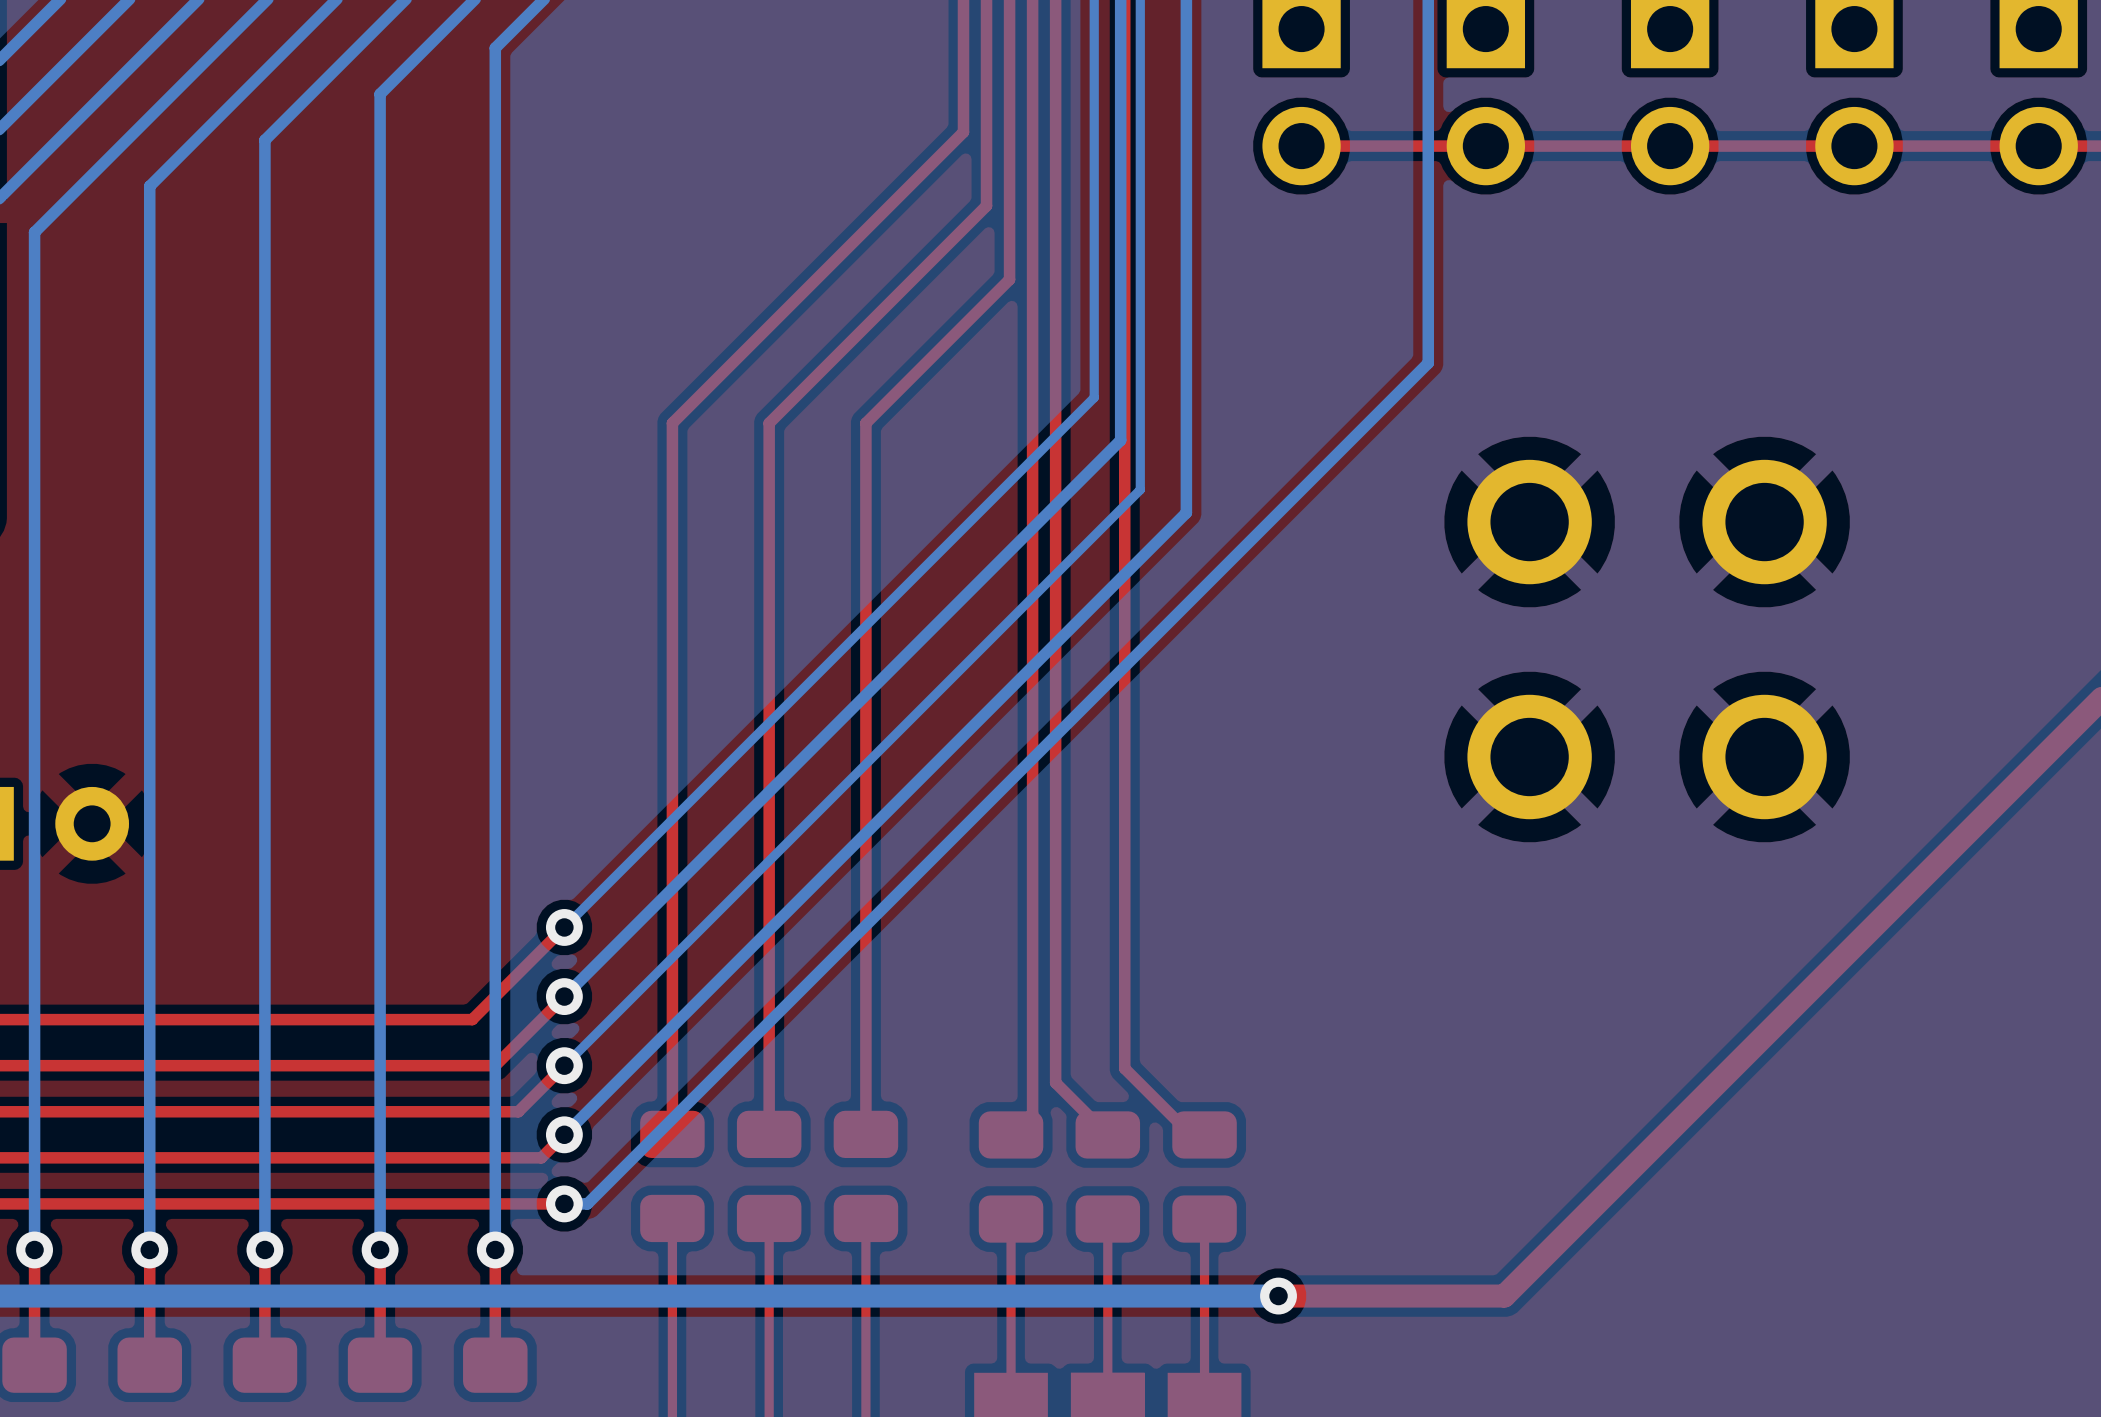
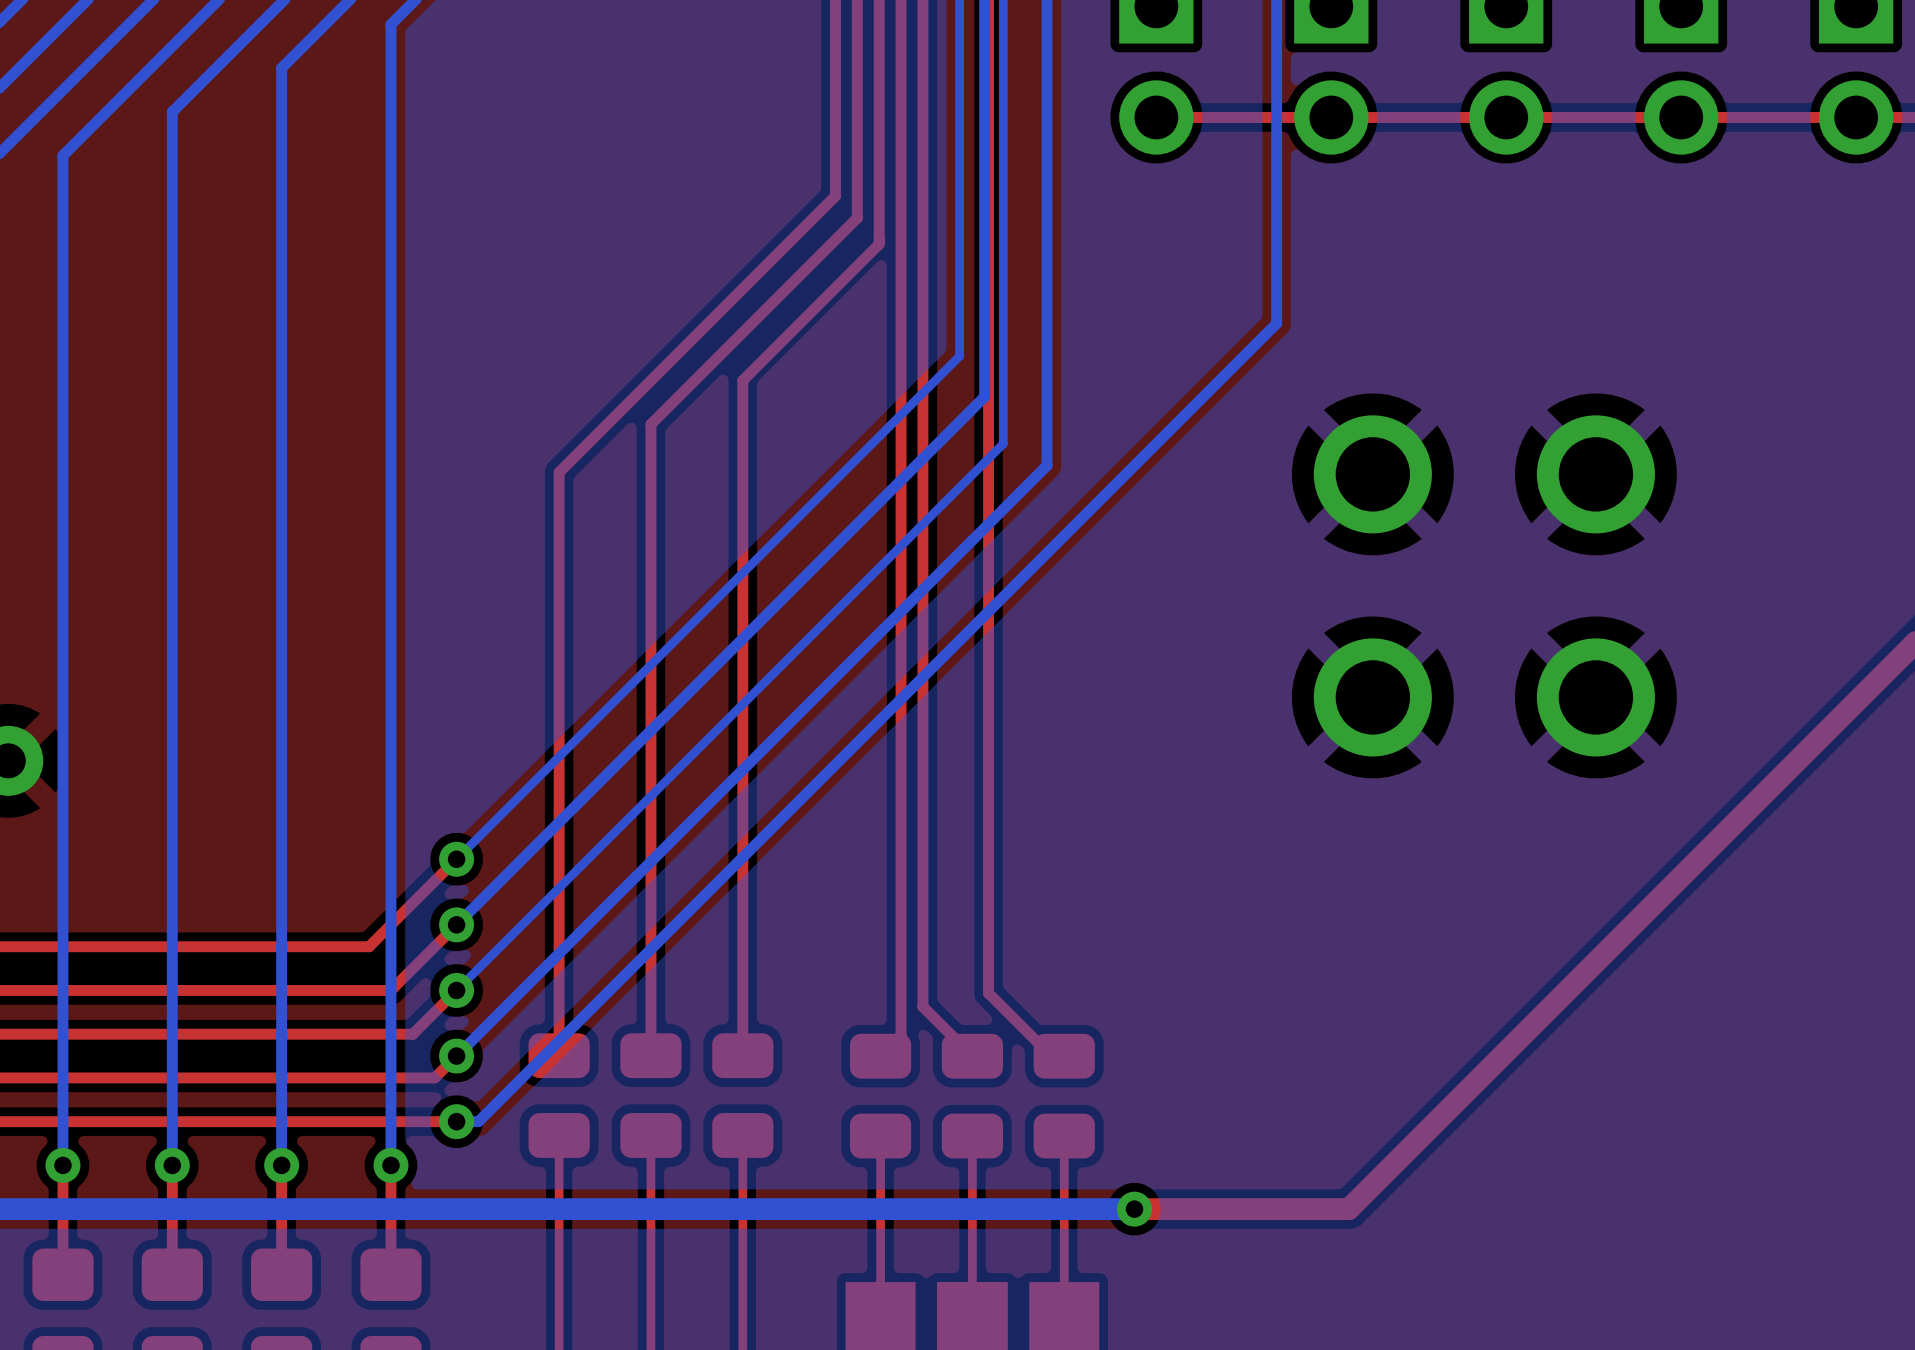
top track: (963, 132) (672, 423) (672, 519) -> none
top track: (986, 205) (963, 228) -> (835, 104) (835, 196)
top track: none -> (857, 174) (857, 217) (650, 424)
top track: (769, 423) (769, 469) -> (650, 380) (559, 472)

